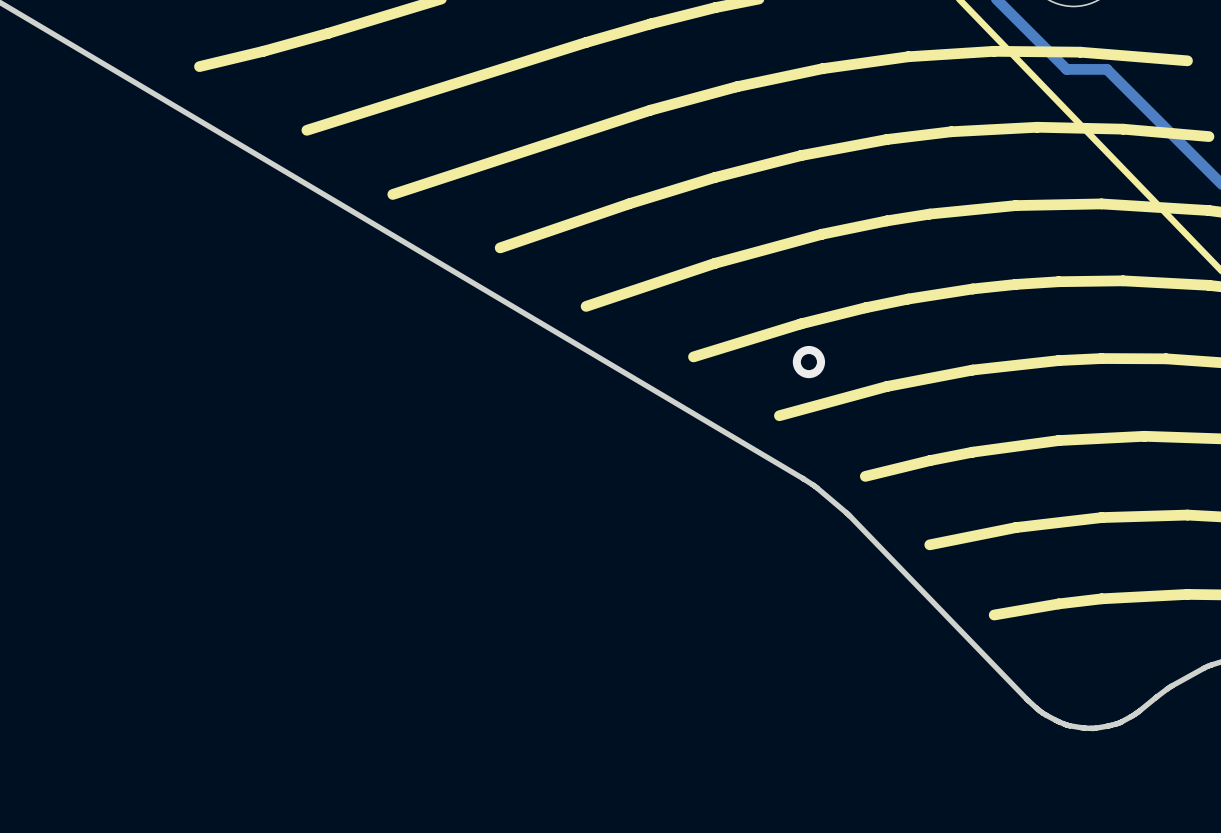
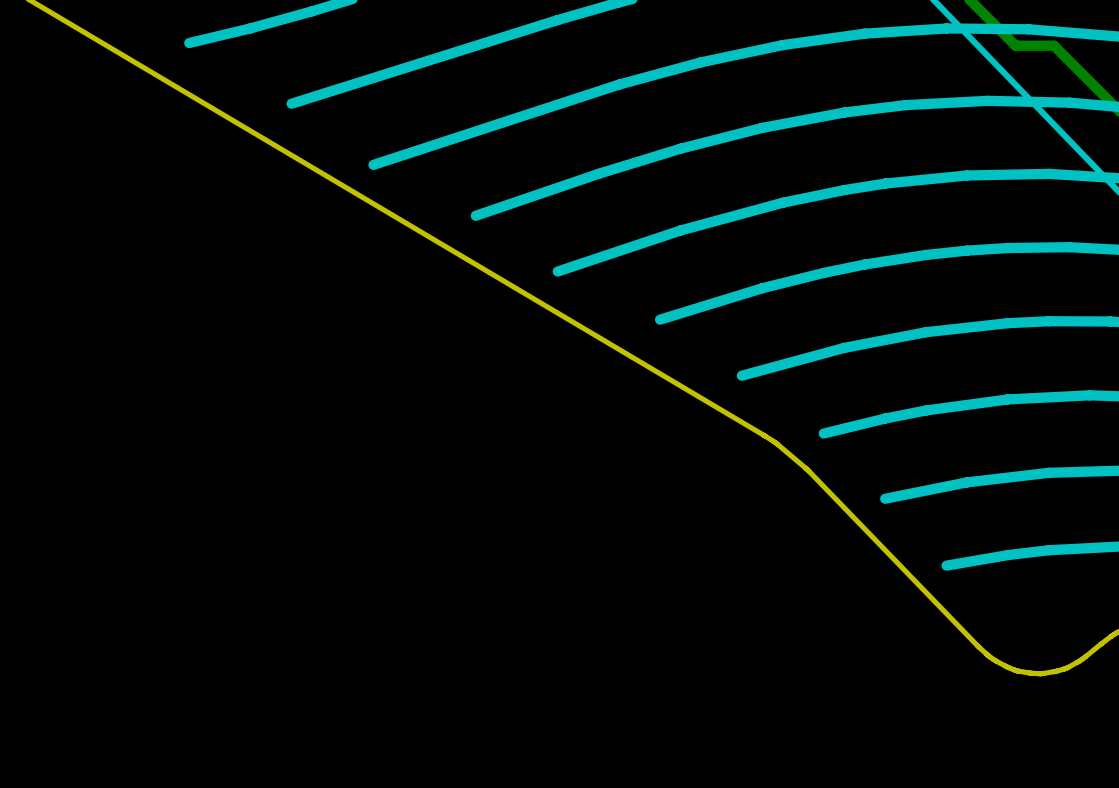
via: (808, 362) -> none

